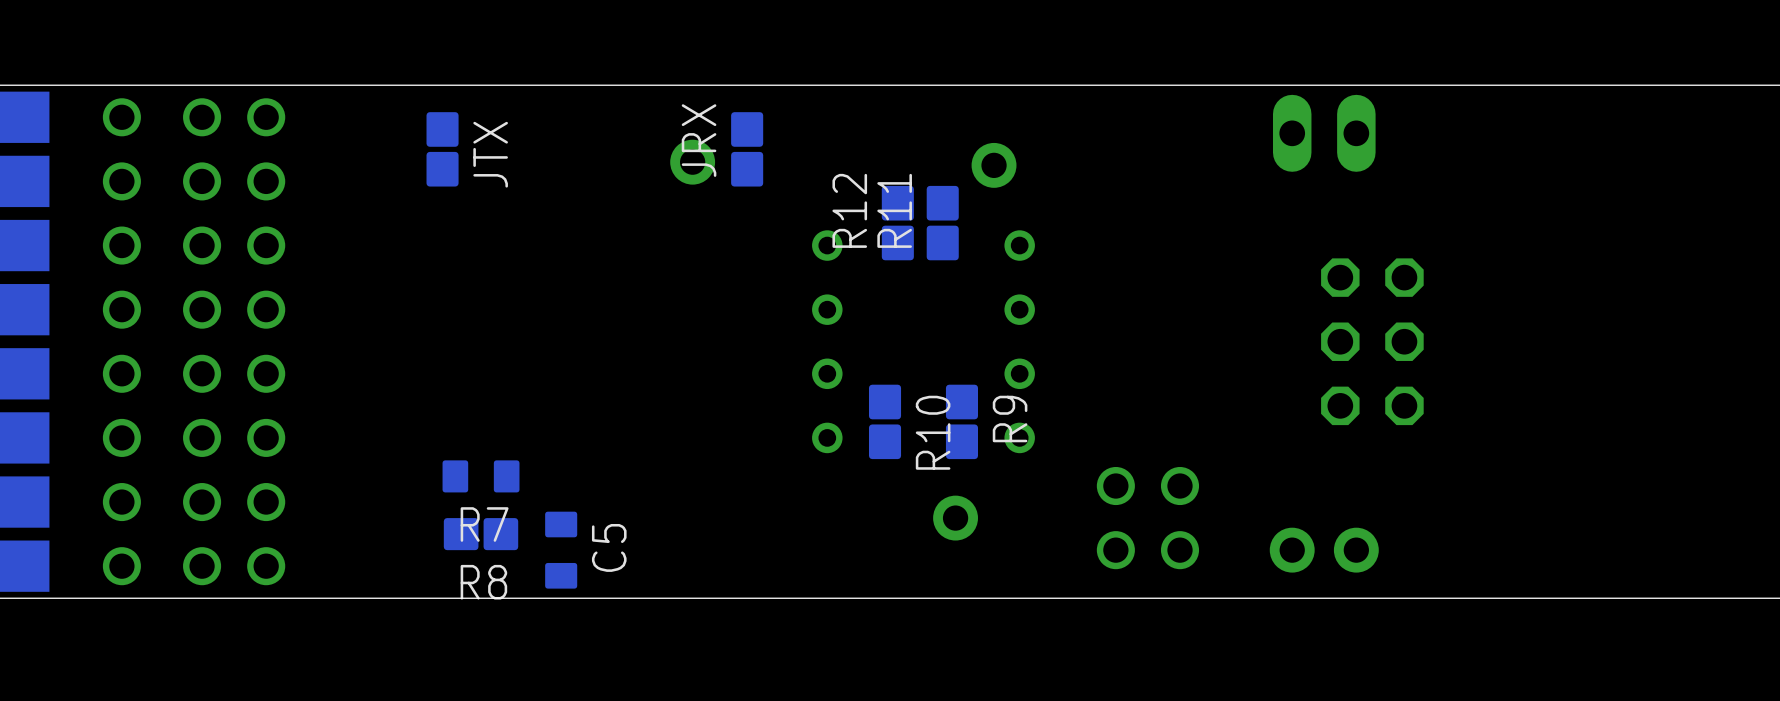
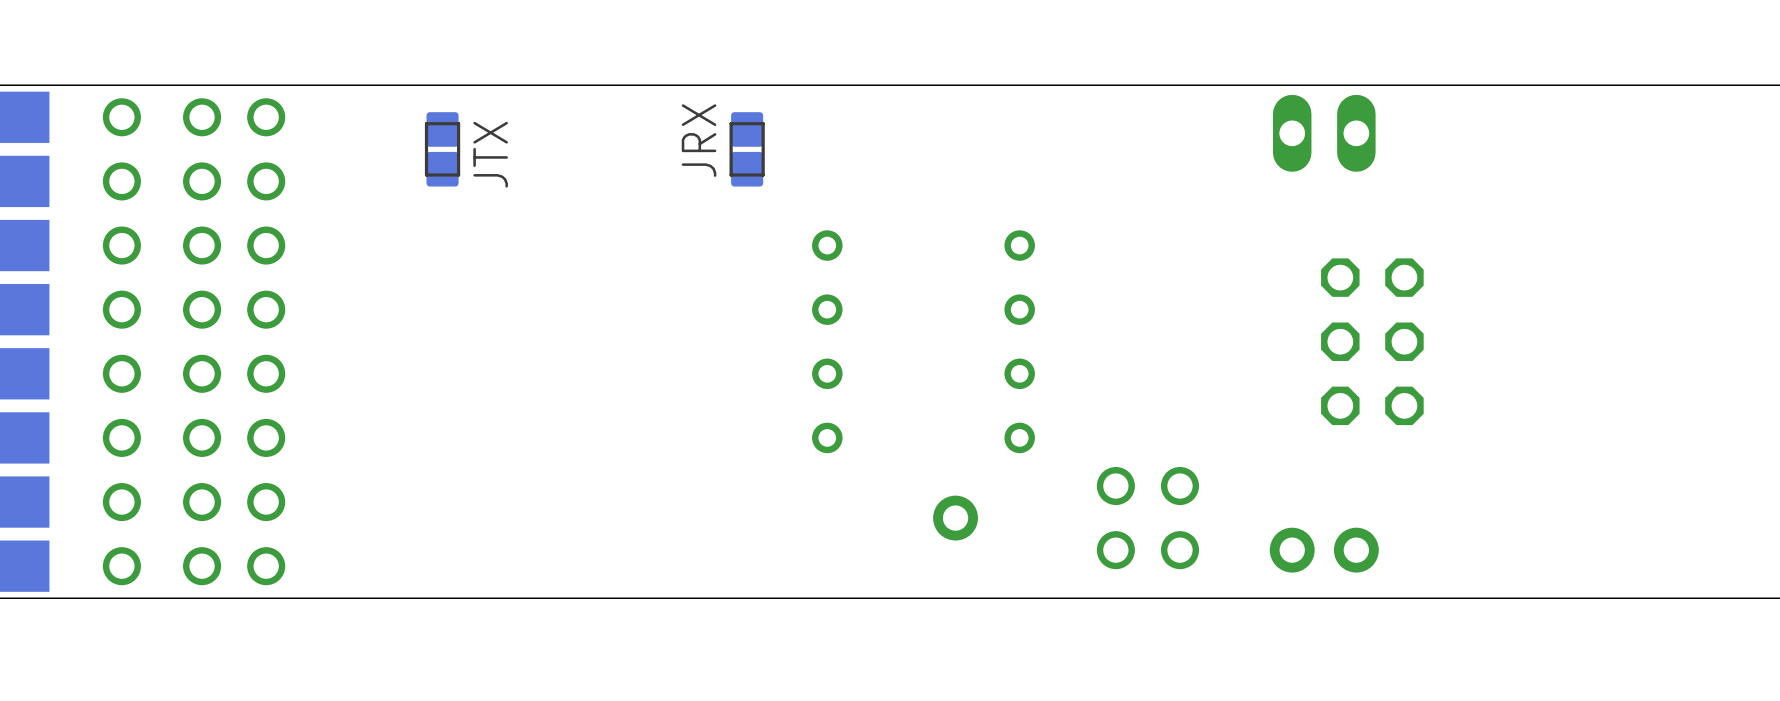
JTX footprint: [426, 112, 459, 187] -> [424, 112, 461, 187]
JRX footprint: [731, 112, 764, 187] -> [729, 112, 765, 187]
part: (692, 162) -> none
part: (994, 165) -> none
R12: (897, 223) -> none
R11: (942, 223) -> none
R10: (885, 421) -> none
R9: (961, 421) -> none
R7: (481, 476) -> none
R8: (481, 534) -> none
C5: (561, 550) -> none

